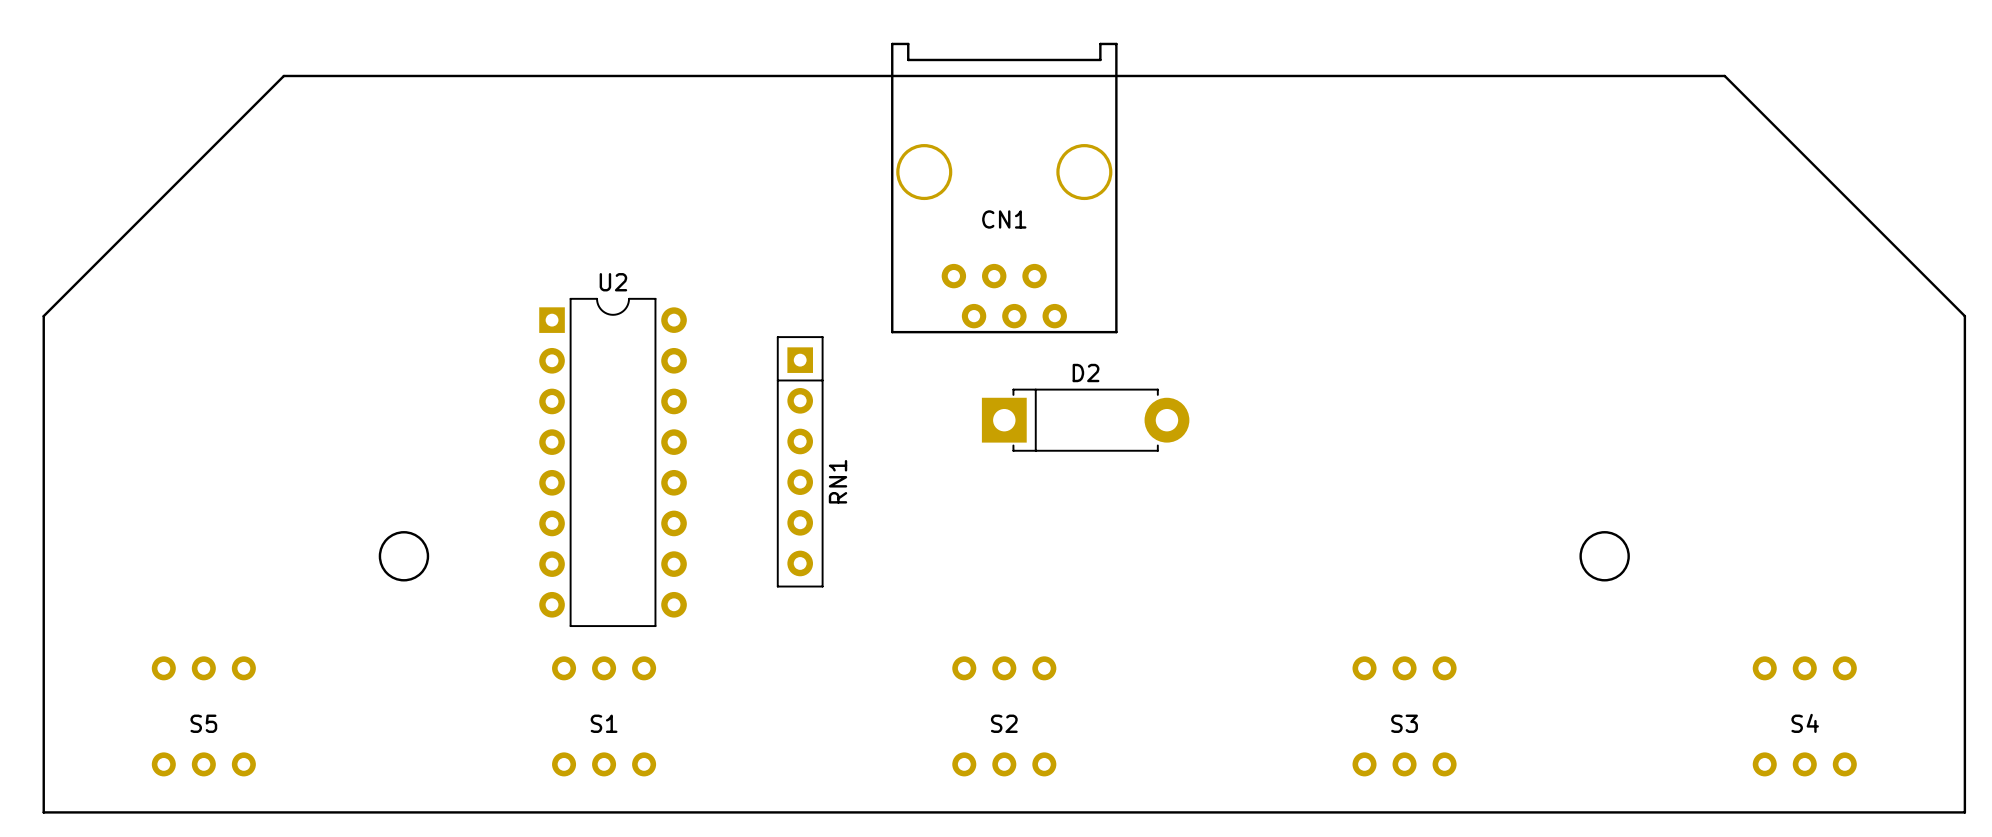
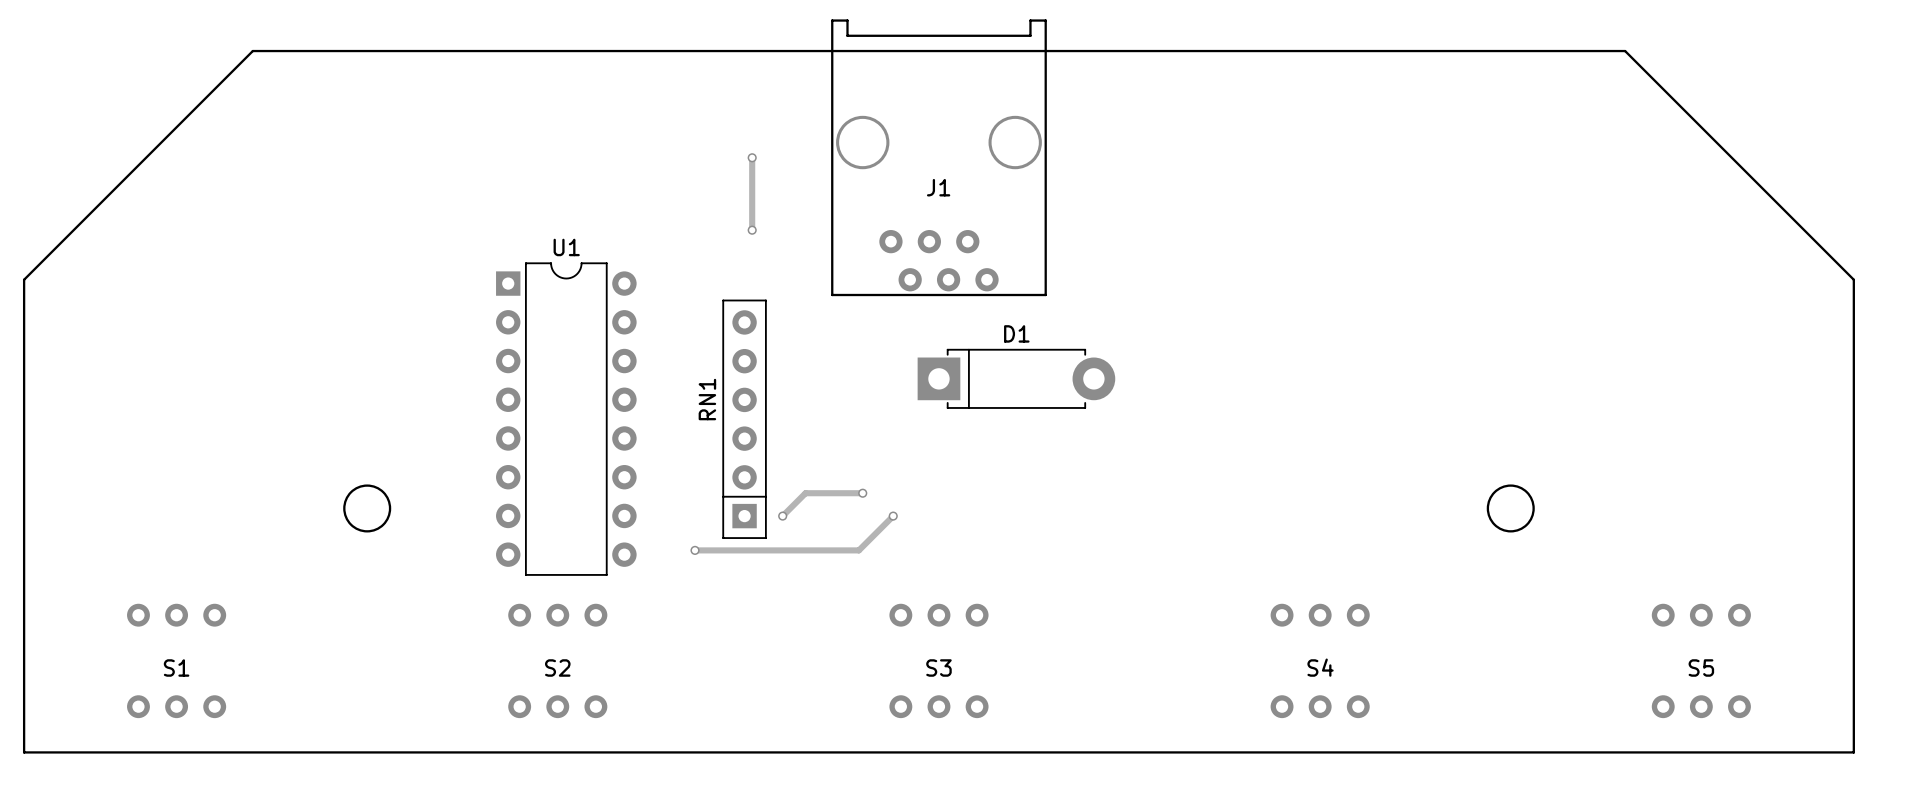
track: none -> (752, 157) (752, 230)
via: none -> (752, 157)
CN1 name: CN1 (1004, 219) -> J1 (938, 187)
via: none -> (752, 230)
U2 name: U2 (613, 282) -> U1 (566, 247)
D2 name: D2 (1086, 373) -> D1 (1016, 333)
RN1 rotation: 0° (800, 461) -> 180° (744, 419)
track: none -> (862, 493) (805, 493) (782, 516)
via: none -> (862, 493)
via: none -> (782, 516)
track: none -> (893, 516) (858, 550) (695, 550)
via: none -> (893, 516)
via: none -> (695, 550)
S5 name: S5 (203, 723) -> S1 (176, 668)
S1 name: S1 (604, 723) -> S2 (557, 668)
S2 name: S2 (1004, 723) -> S3 (938, 668)
S3 name: S3 (1404, 723) -> S4 (1320, 667)
S4 name: S4 (1805, 723) -> S5 (1701, 668)

